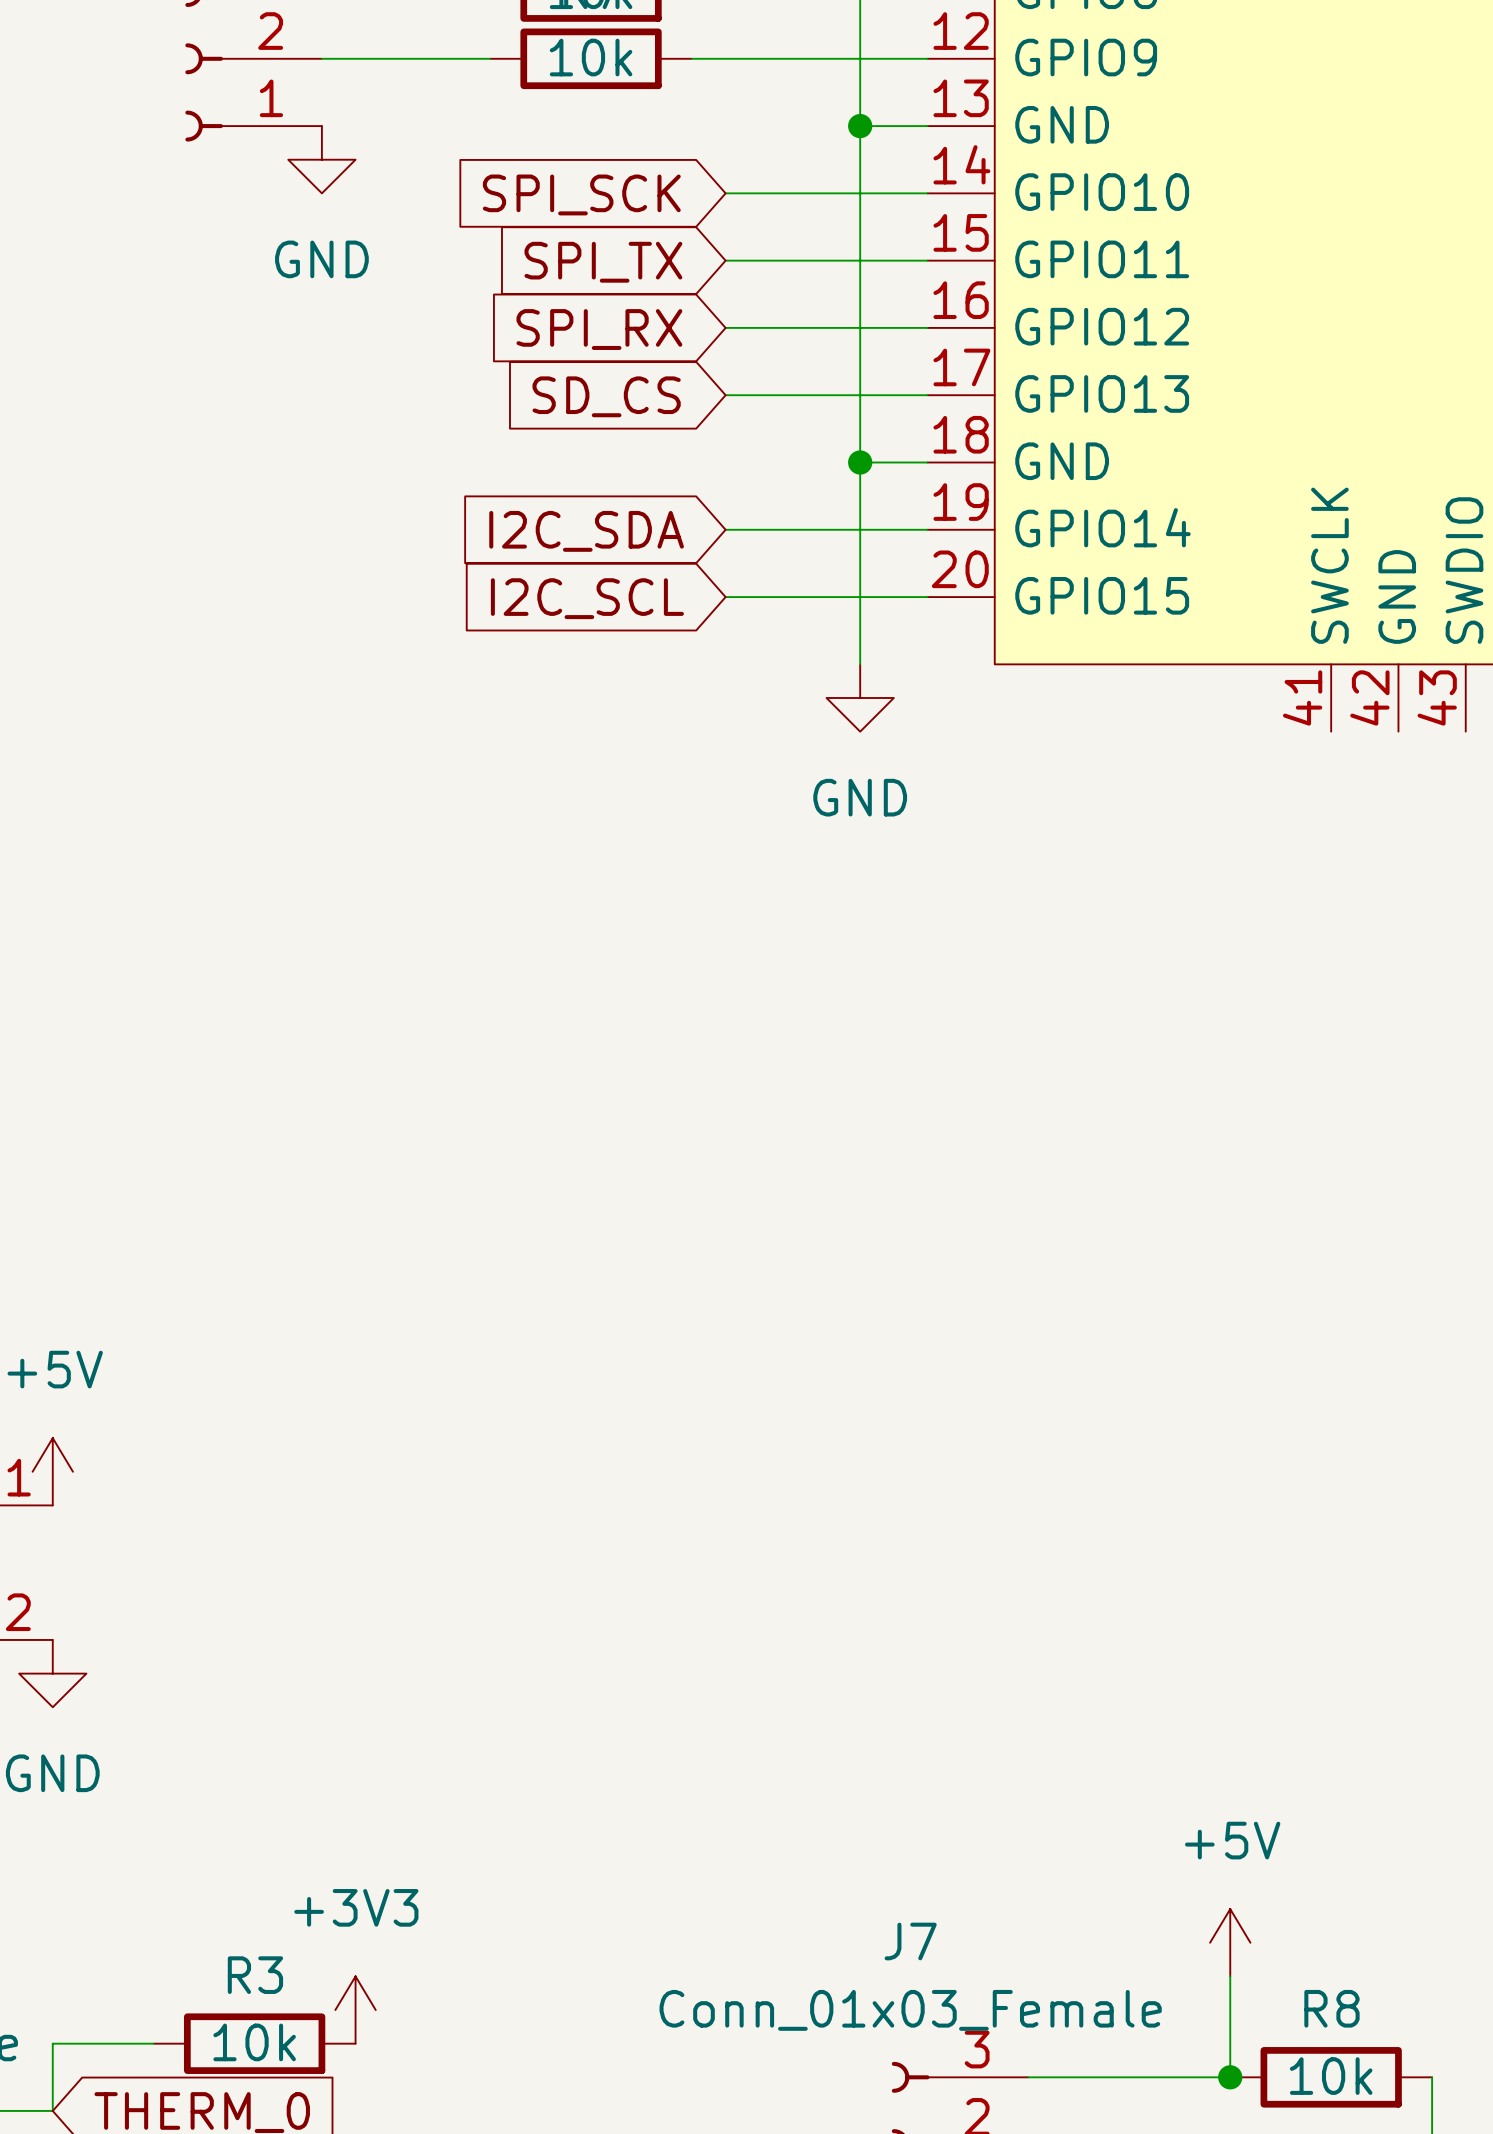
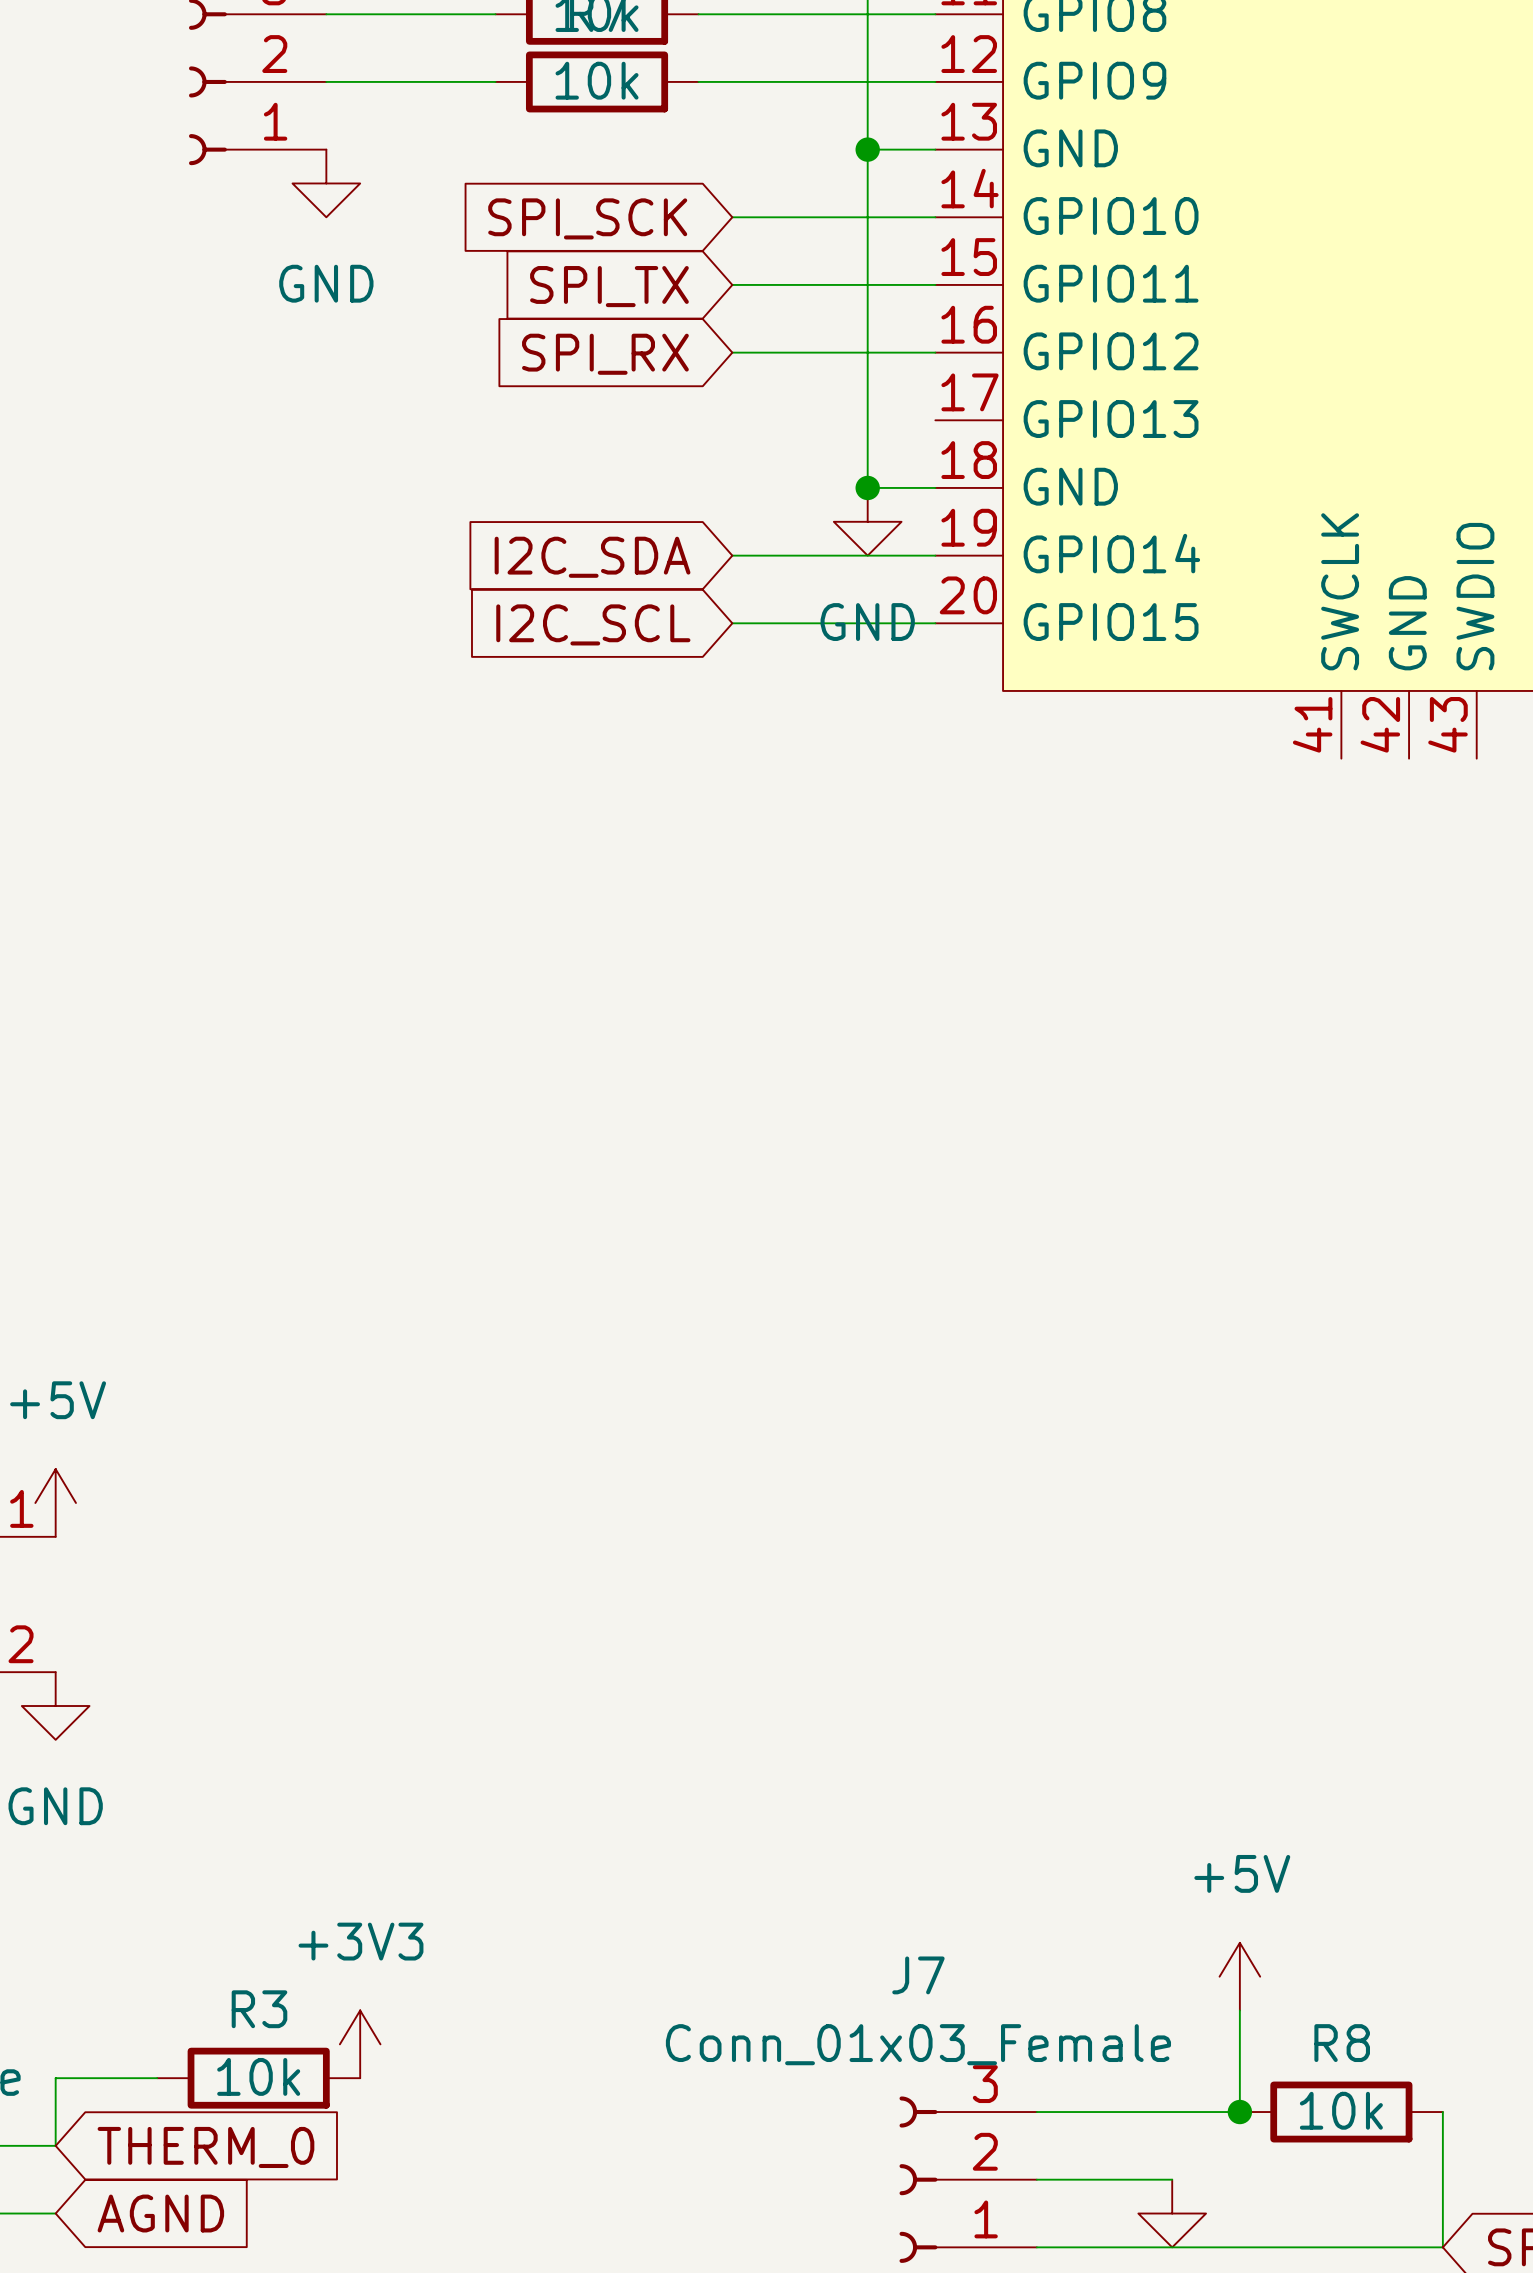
wire: (725, 395) (927, 395) -> none
global label: SD_CS (606, 396) -> none
wire: (860, 462) (860, 664) -> none
power symbol position: GND (860, 697) -> GND (867, 521)

